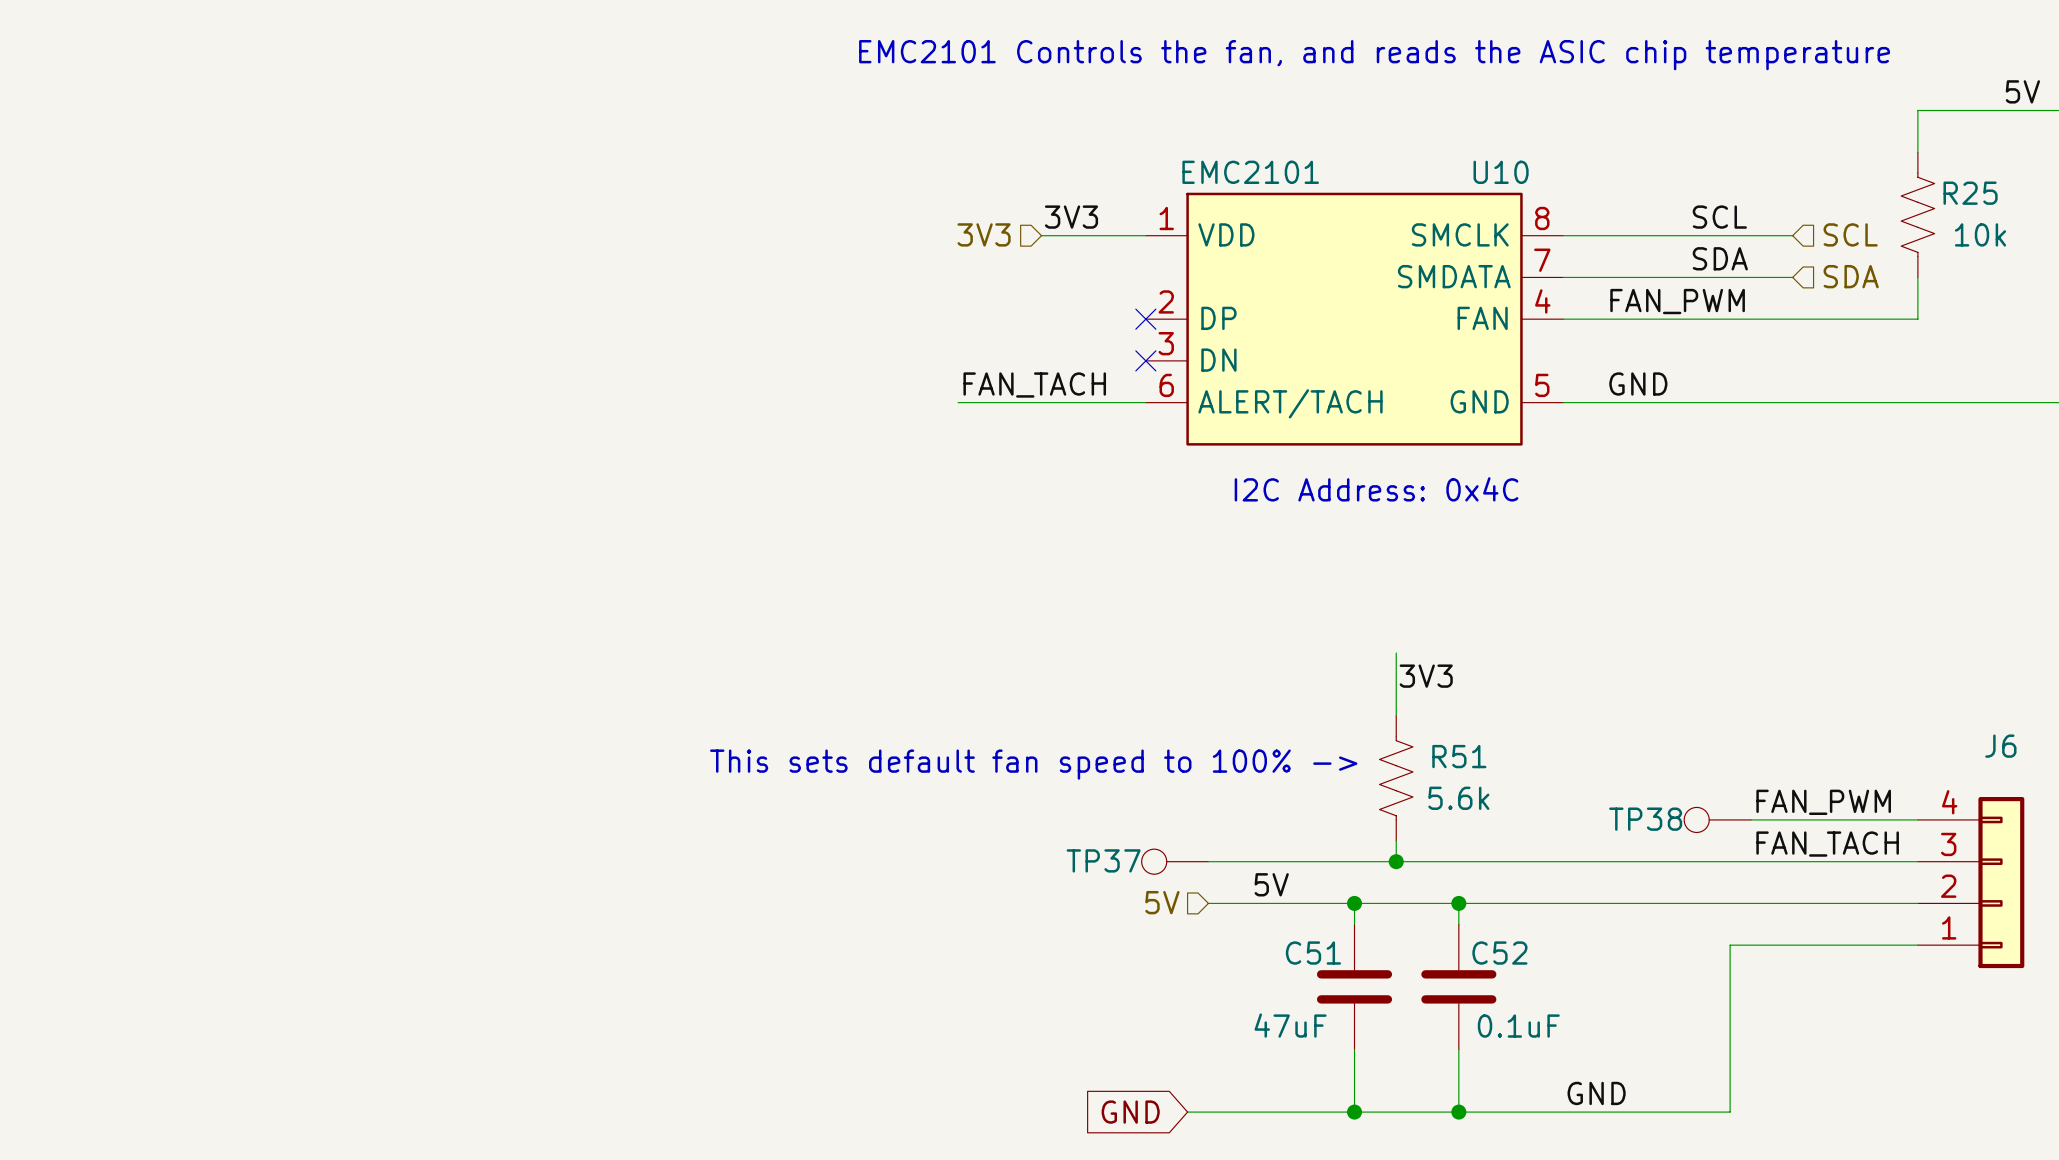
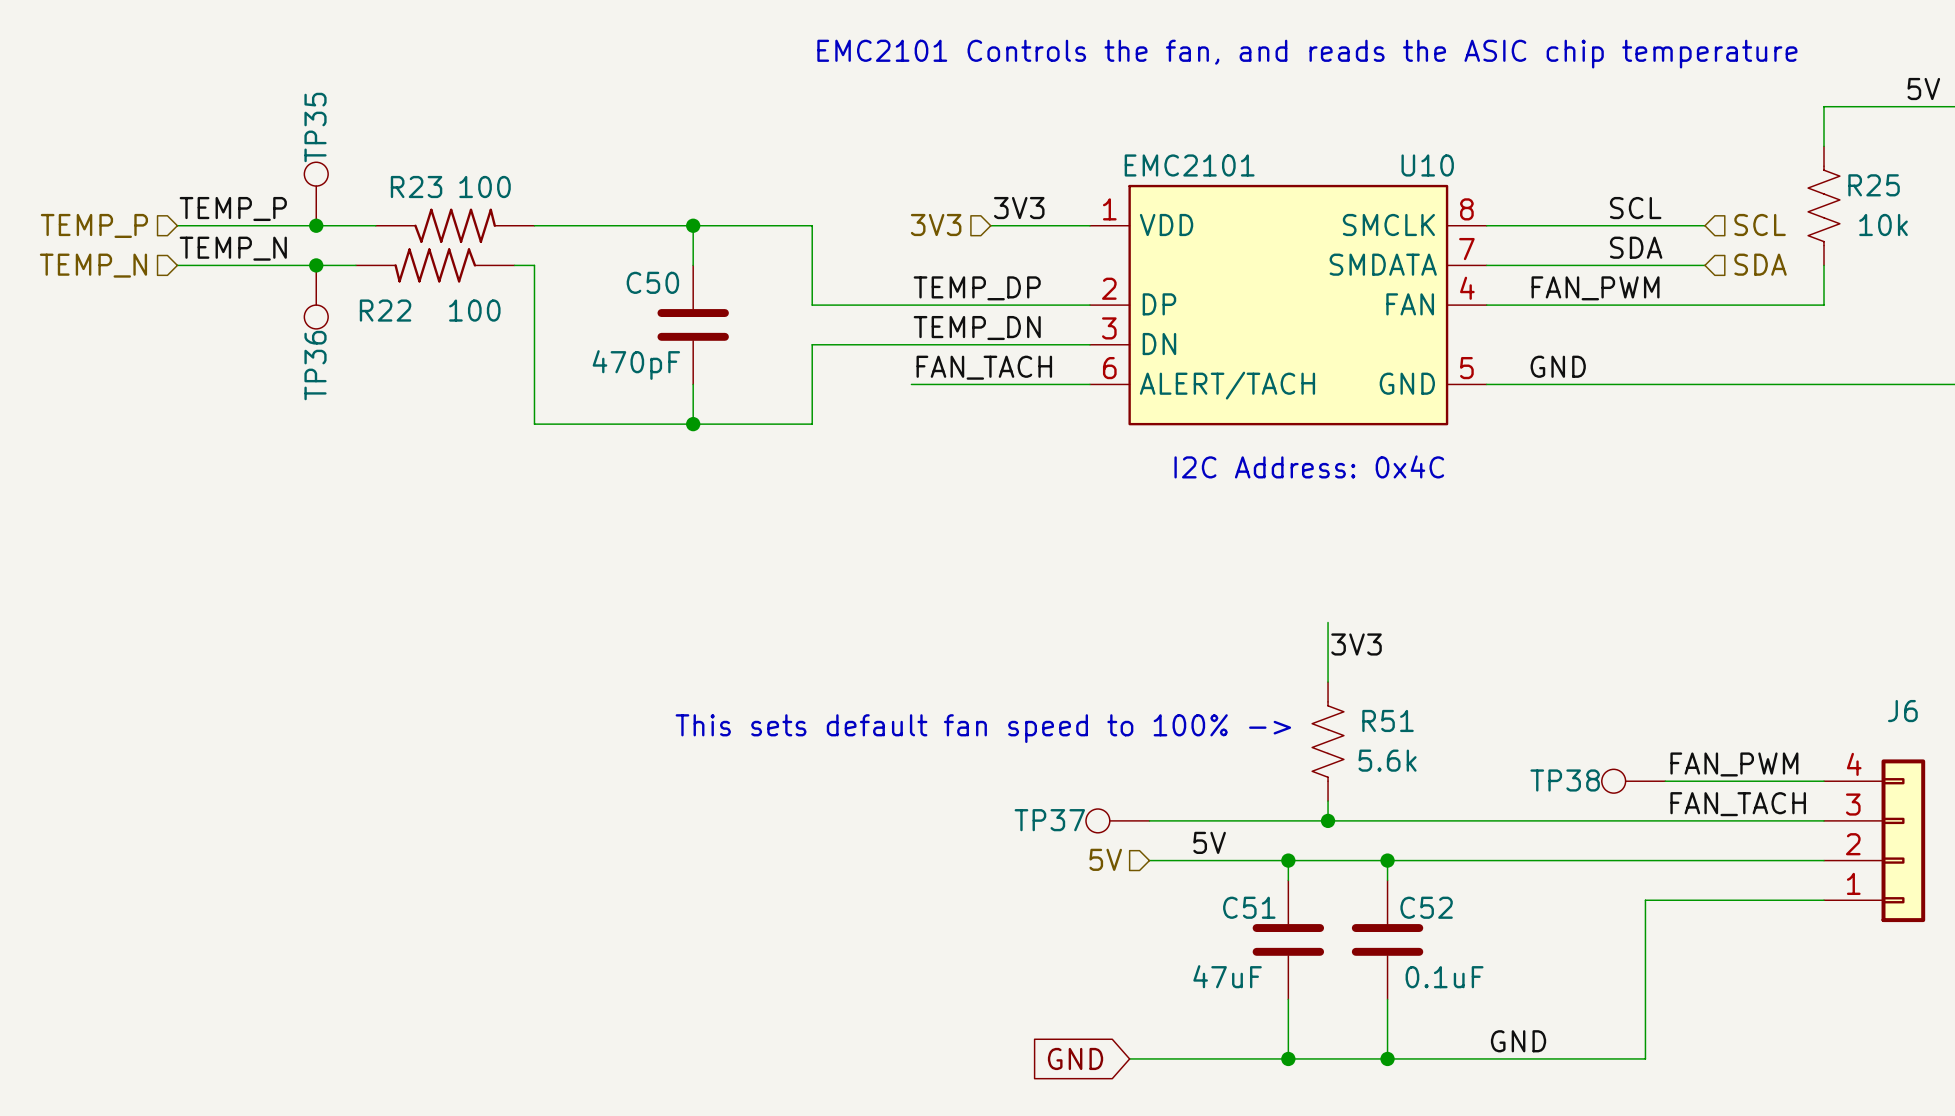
TP35: none -> (316, 194)
label: none -> TEMP_P (233, 208)
hierarchical label: none -> TEMP_P (94, 225)
wire: none -> (177, 225) (375, 225)
junction: none -> (316, 225)
R23: none -> 100 (455, 225)
wire: none -> (534, 225) (812, 225) (812, 305) (1089, 305)
wire: none -> (693, 225) (693, 265)
junction: none -> (693, 225)
label: none -> TEMP_N (233, 248)
hierarchical label: none -> TEMP_N (93, 265)
wire: none -> (177, 265) (355, 265)
junction: none -> (316, 265)
R22: none -> 100 (435, 265)
wire: none -> (514, 265) (534, 265) (534, 424) (812, 424) (812, 344) (1089, 344)
label: none -> TEMP_DP (977, 288)
TP36: none -> (316, 297)
no-connect mark: (1145, 319) -> none
C50: none -> 470pF (693, 324)
label: none -> TEMP_DN (977, 328)
no-connect mark: (1145, 360) -> none
wire: none -> (693, 384) (693, 424)
junction: none -> (693, 424)

